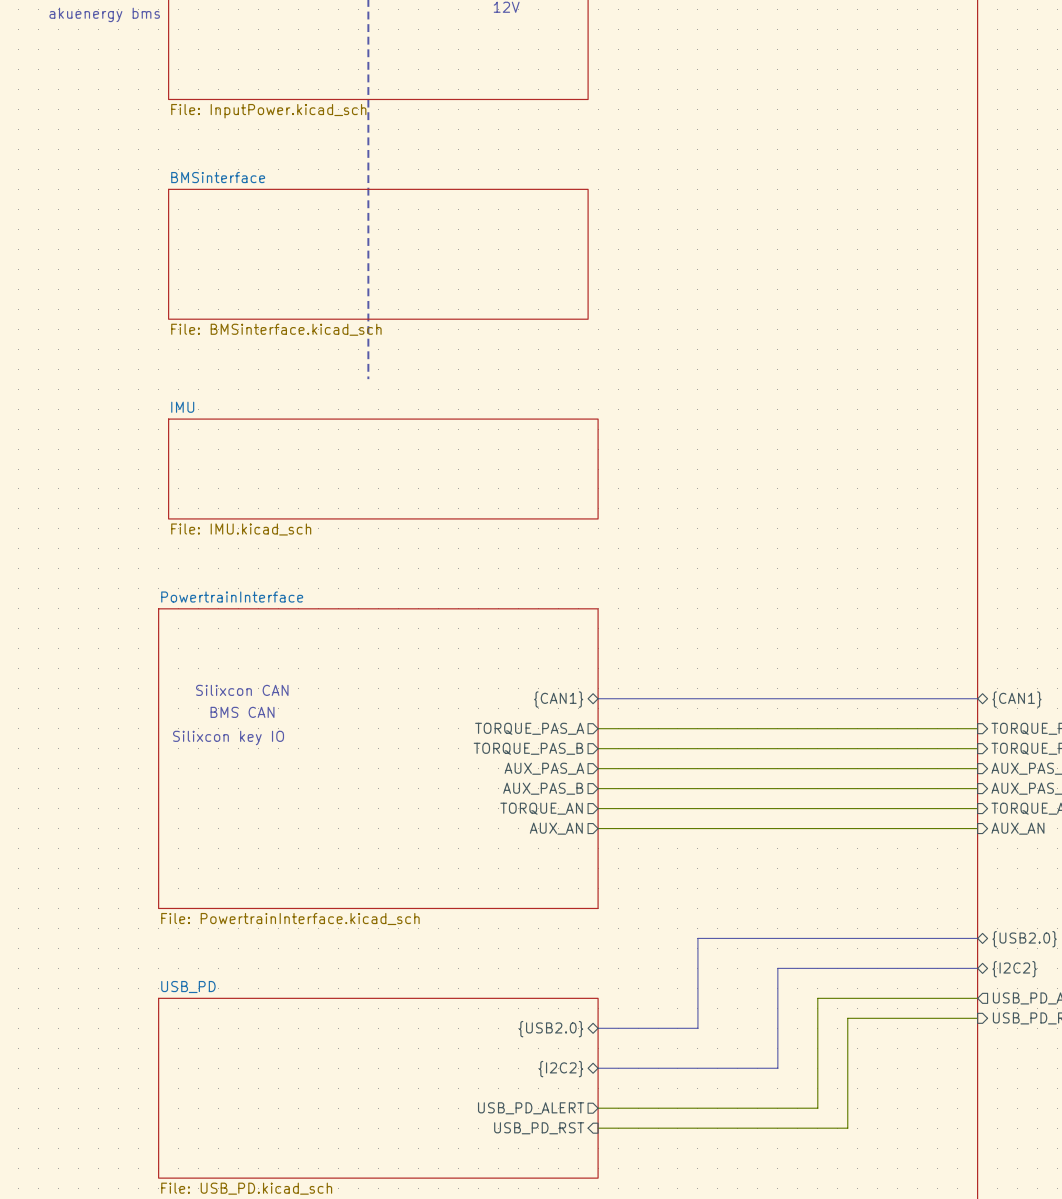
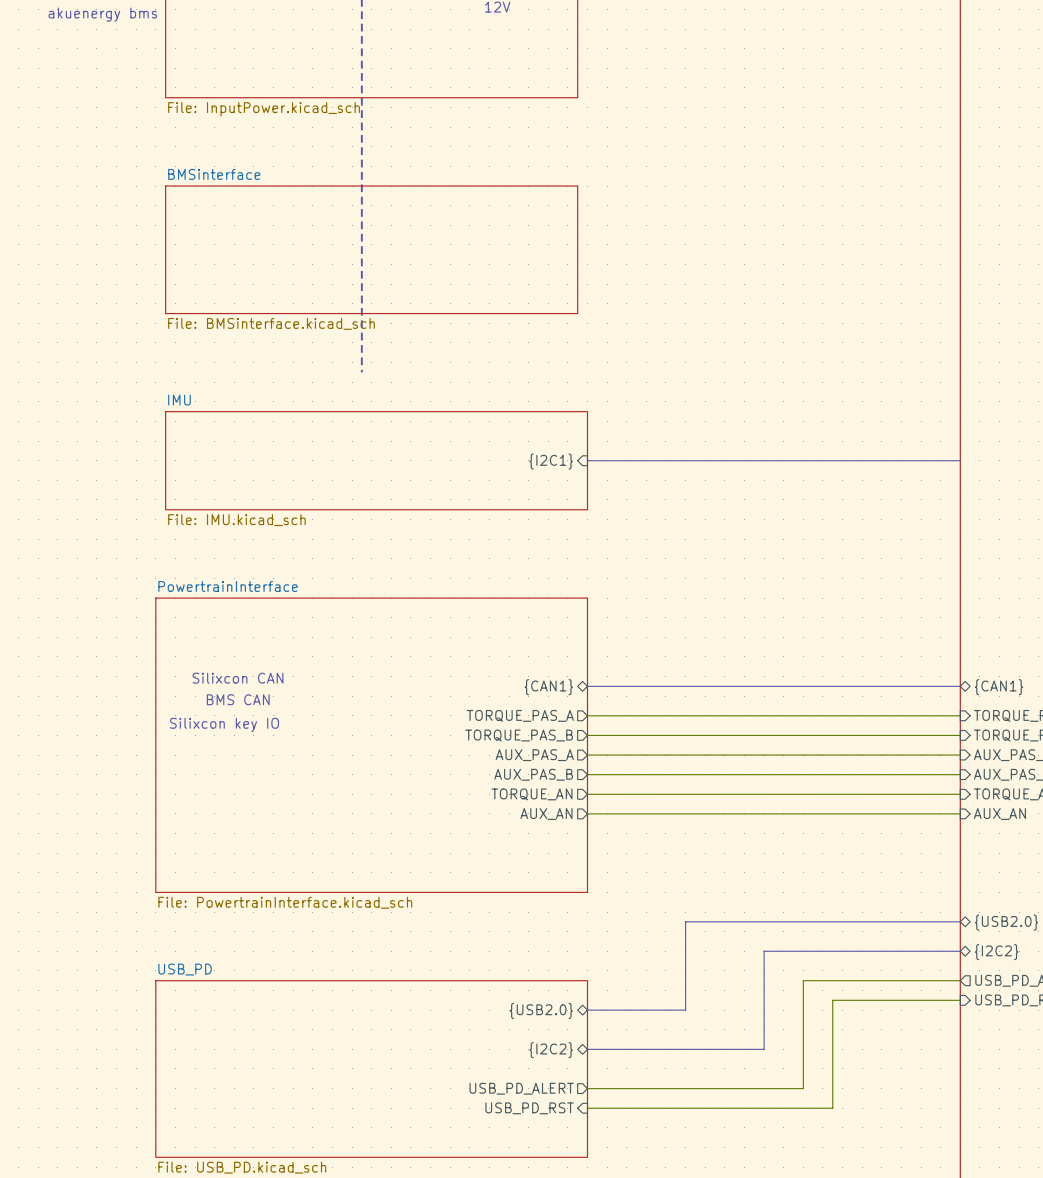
sheet pin: none -> {I2C1} (551, 461)
bus: none -> (587, 460) (960, 460)

